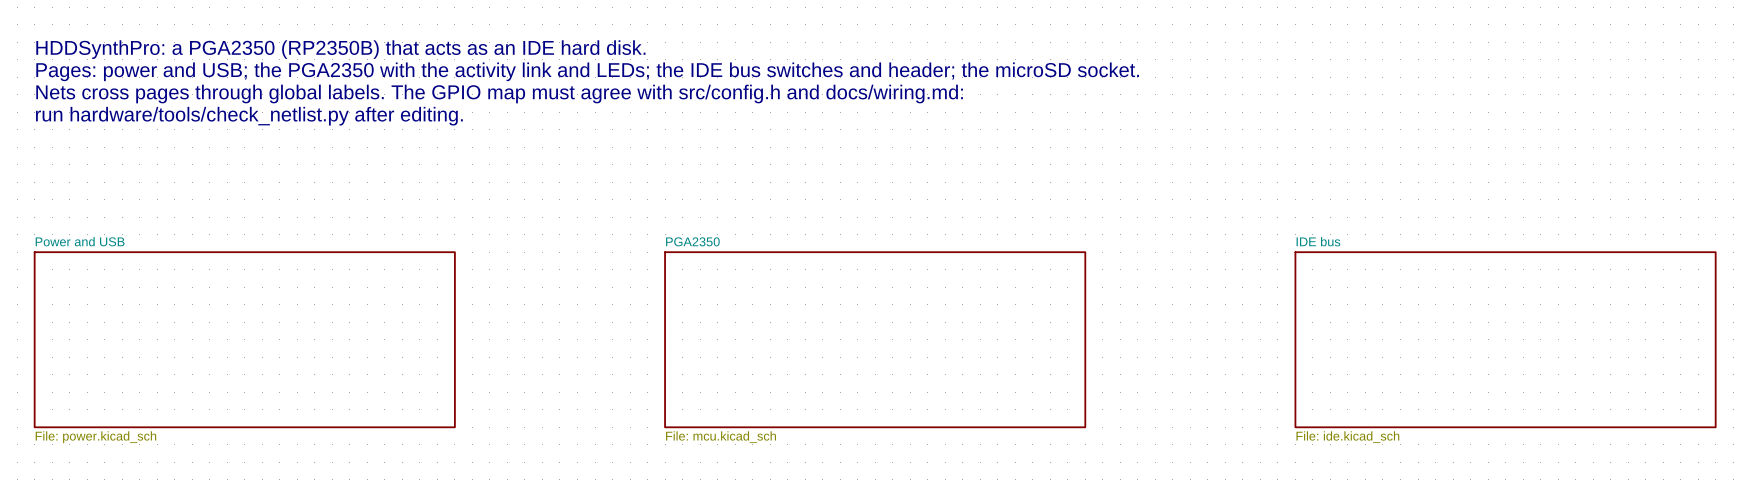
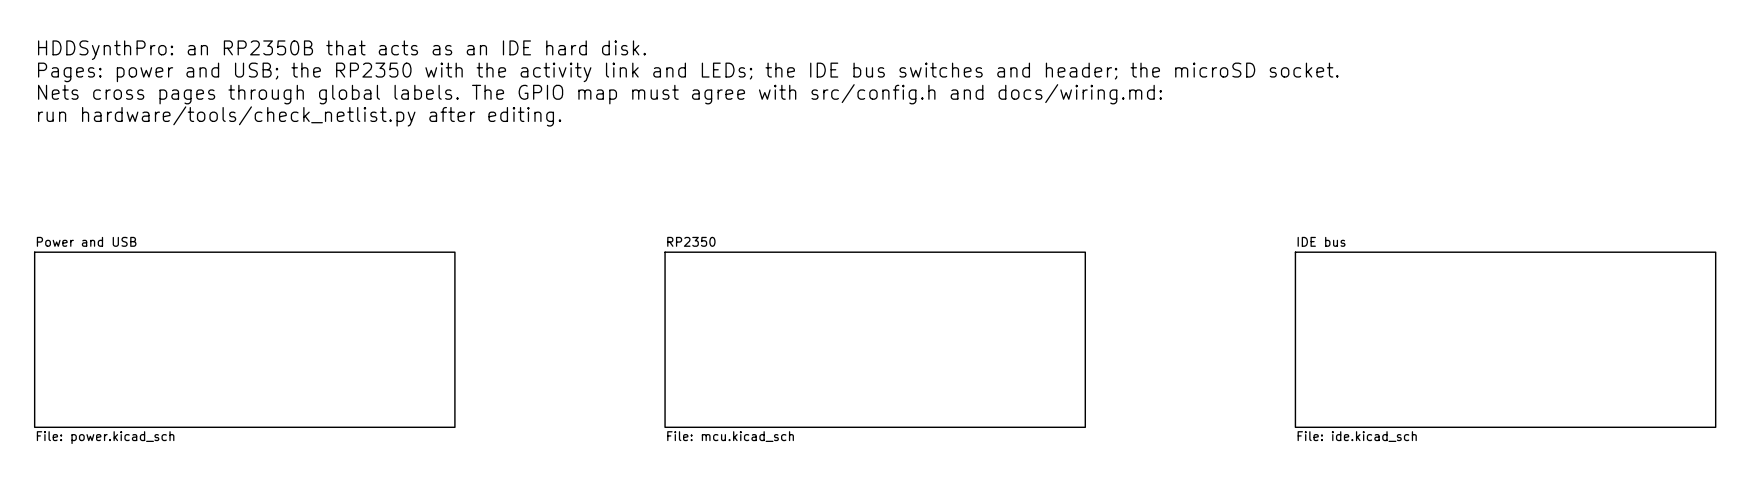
text: HDDSynthPro: a PGA2350 (RP2350B) that acts as an IDE hard disk. (340, 49) -> HDDSynthPro: an RP2350B that acts as an IDE hard disk. (341, 50)
text: Pages: power and USB; the PGA2350 with the activity link and LEDs; the IDE bus switches and header; the microSD socket. (587, 71) -> Pages: power and USB; the RP2350 with the activity link and LEDs; the IDE bus switches and header; the microSD socket. (688, 72)
sheet PGA2350 name: PGA2350 (692, 241) -> RP2350 (691, 241)

